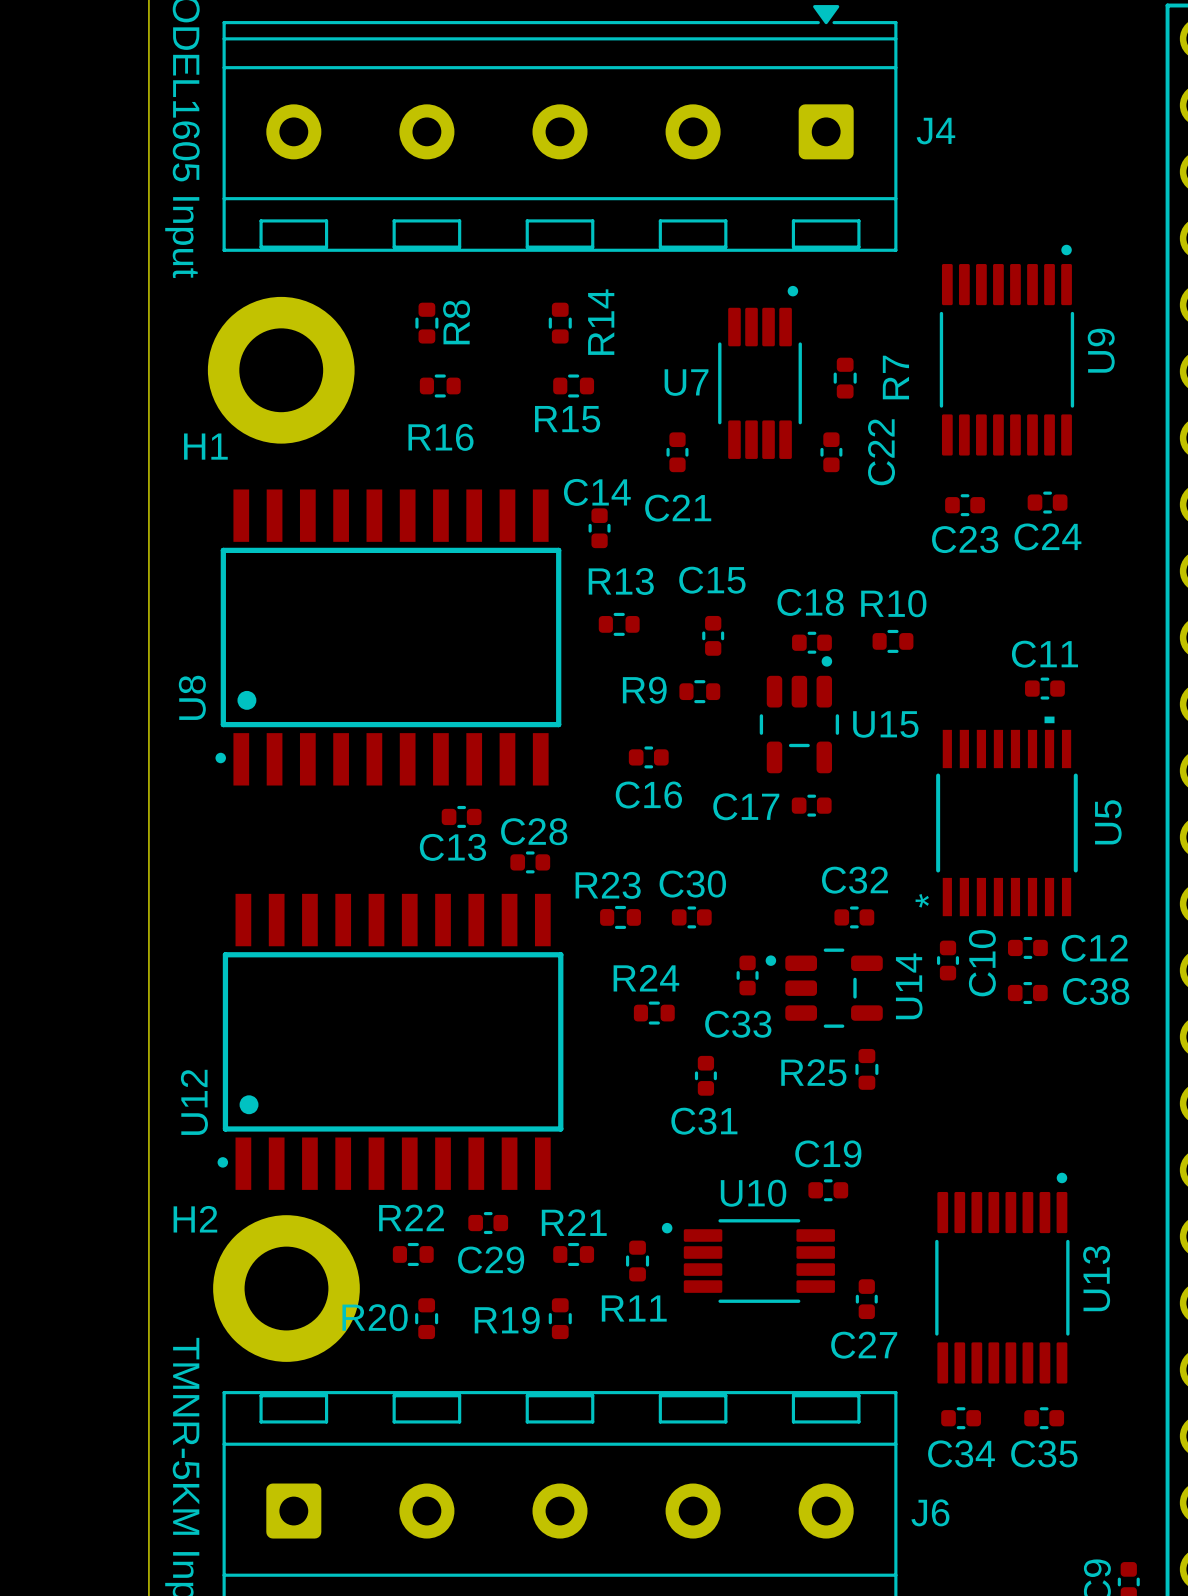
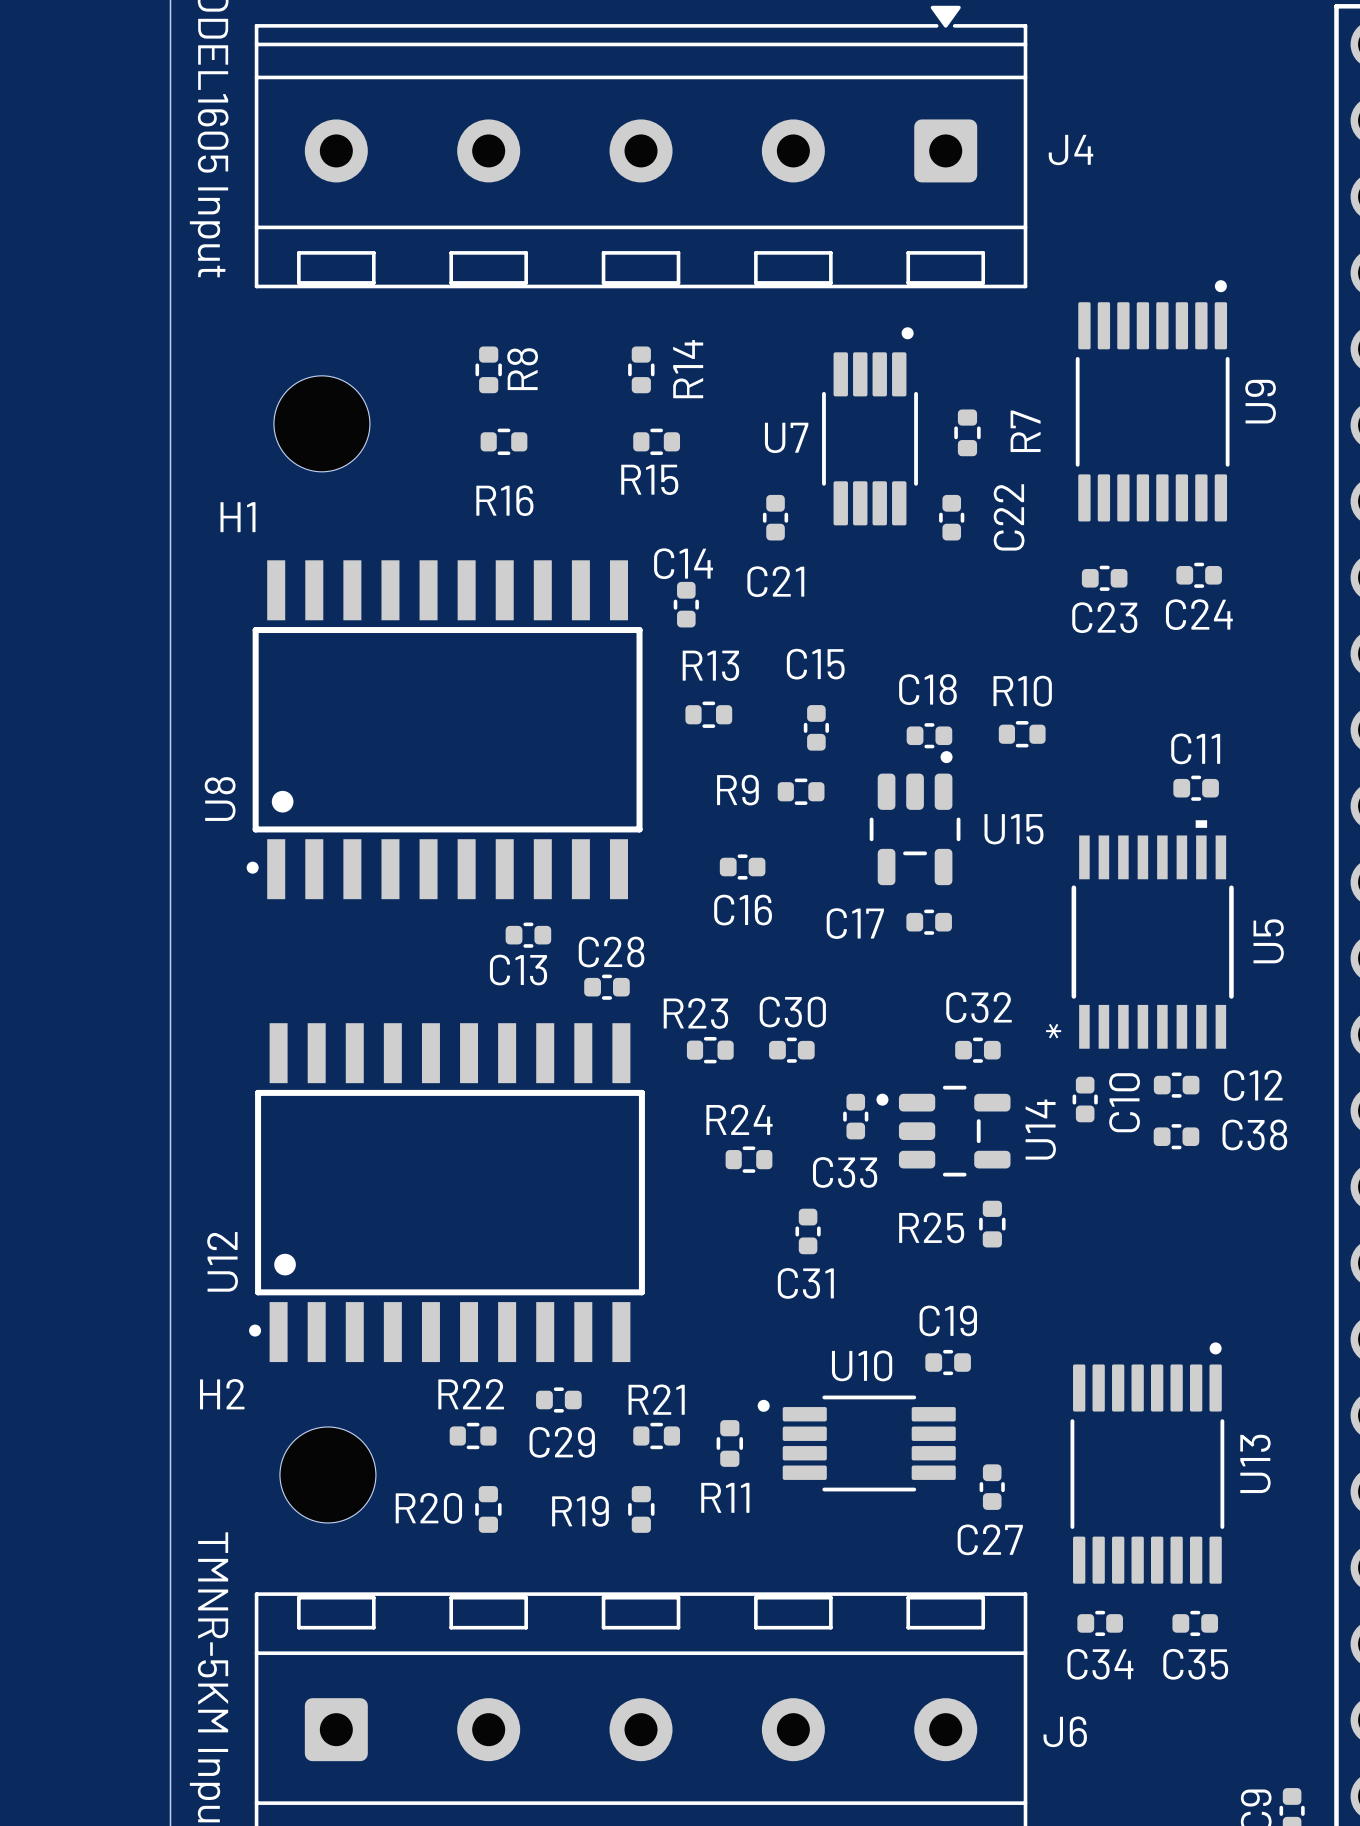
H1 footprint: [207, 296, 355, 444] -> [273, 375, 370, 472]
H2 footprint: [213, 1215, 360, 1362] -> [279, 1426, 376, 1523]

